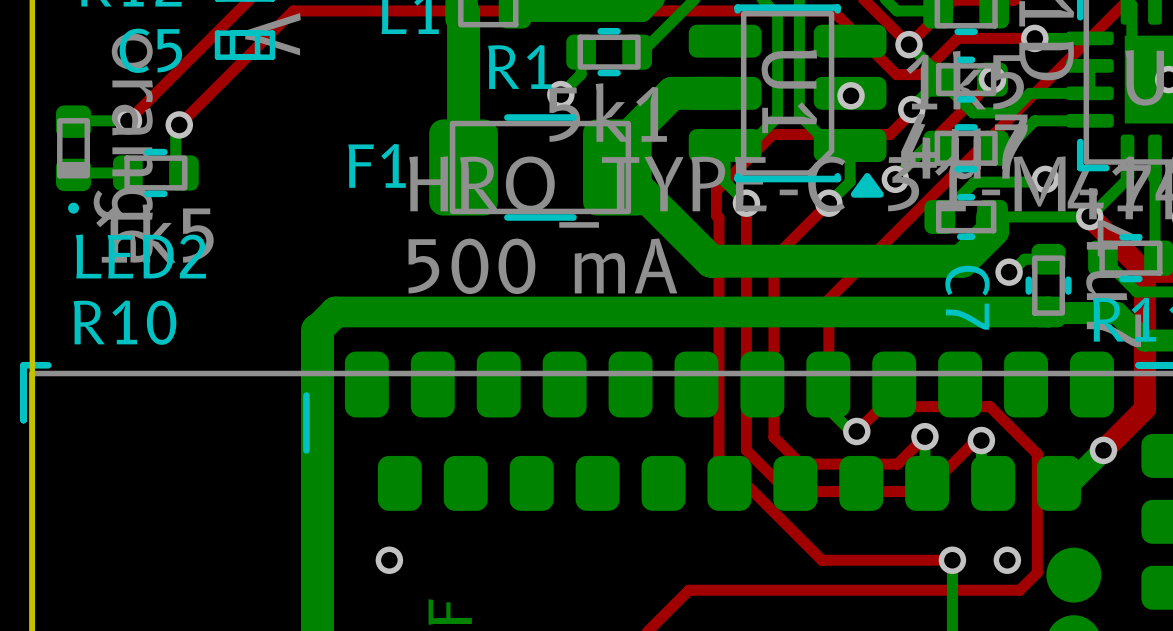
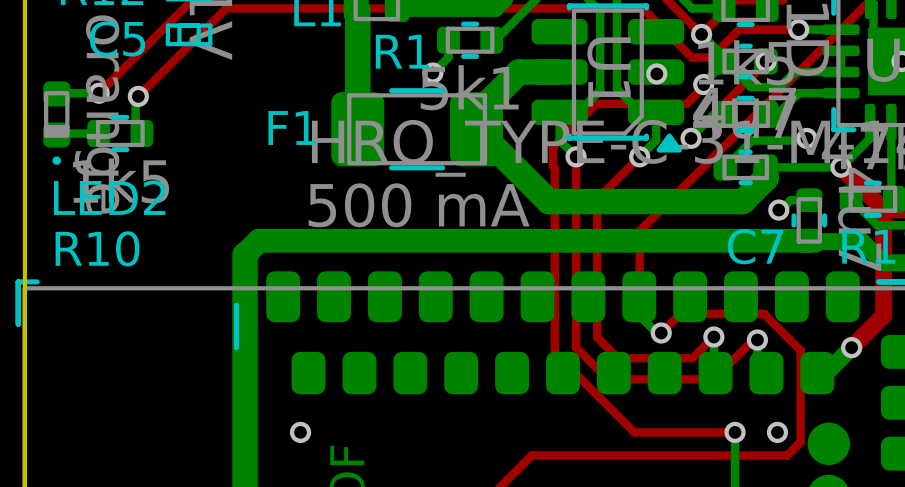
C7 name rotation: 0° (967, 297) -> 90° counterclockwise (755, 246)

